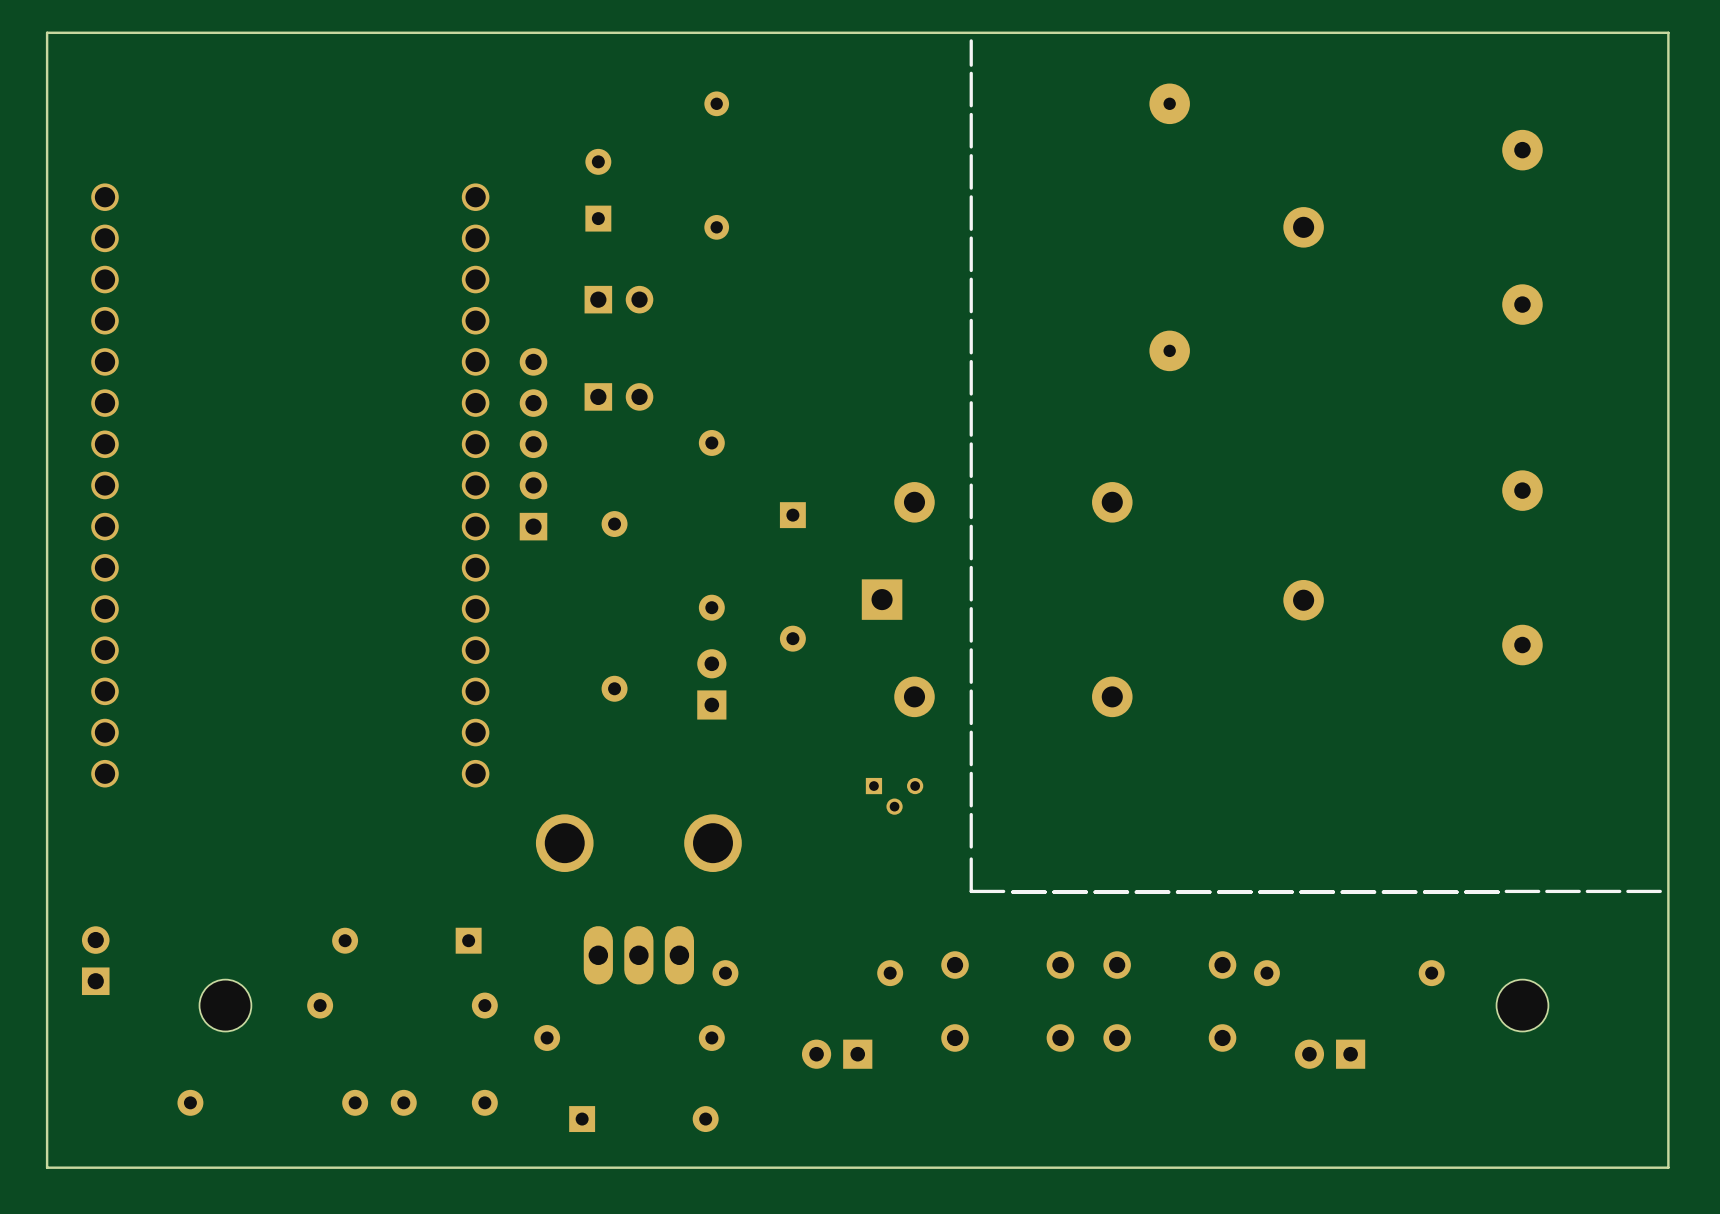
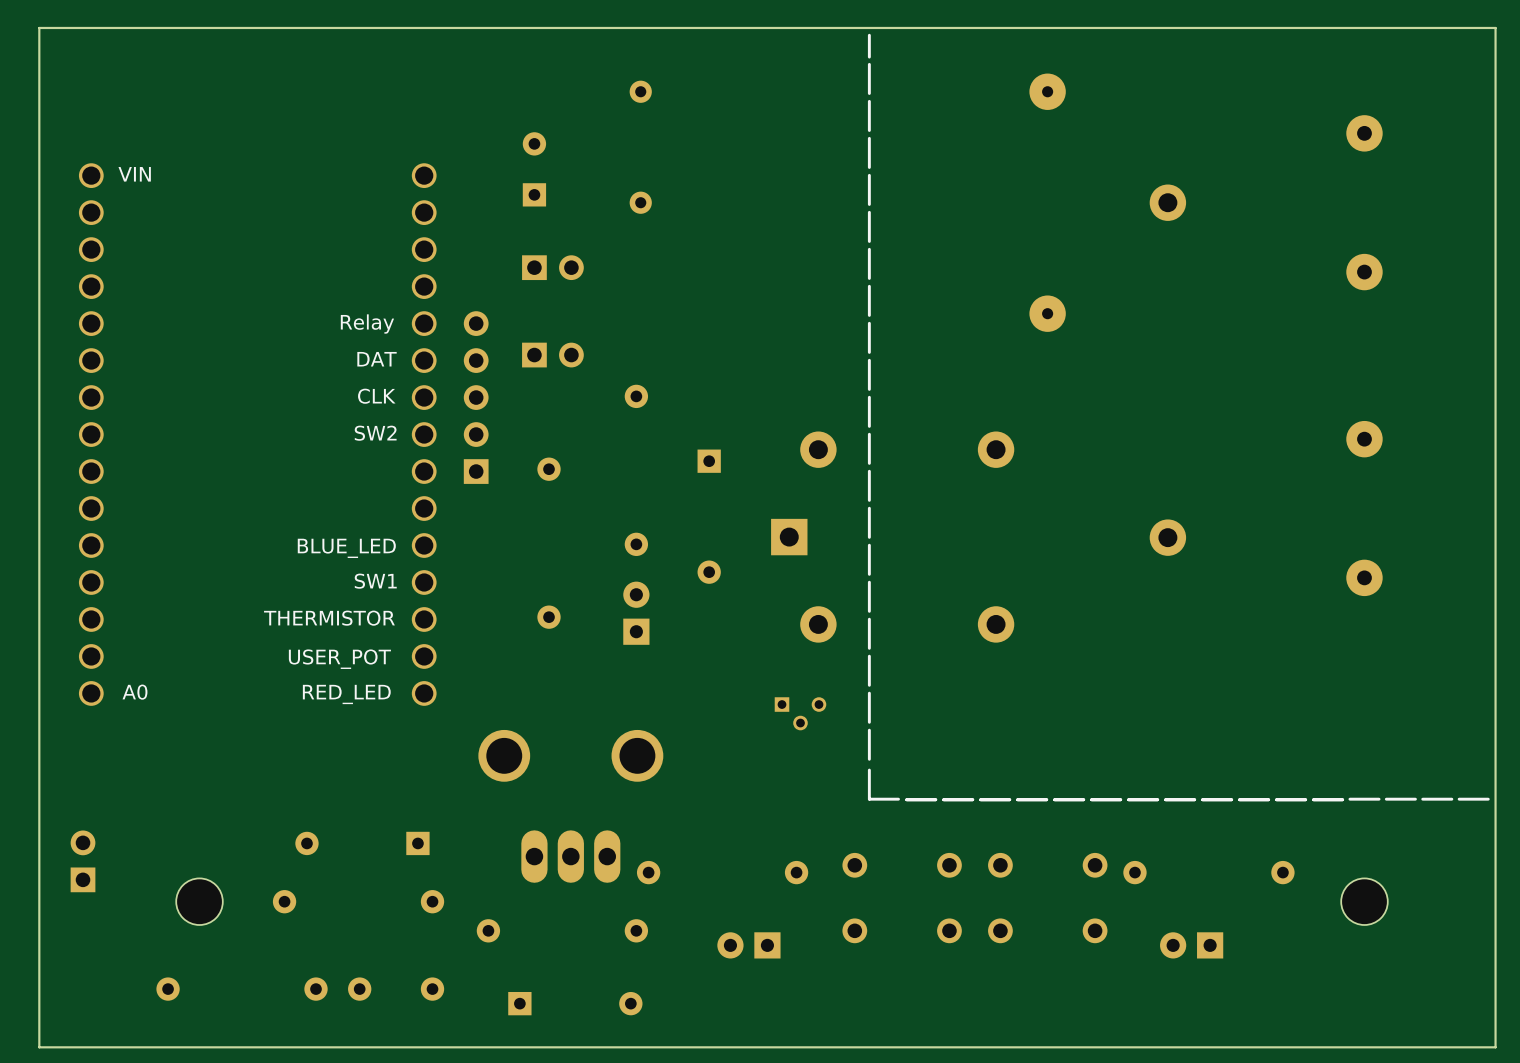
text: none -> VIN (134, 174)
text: none -> Relay (367, 324)
text: none -> DAT (377, 359)
text: none -> CLK (376, 396)
text: none -> SW2 (375, 433)
text: none -> BLUE_LED (346, 548)
text: none -> SW1 (375, 581)
text: none -> THERMISTOR (329, 618)
text: none -> USER_POT (339, 659)
text: none -> A0 (134, 692)
text: none -> RED_LED (346, 694)

